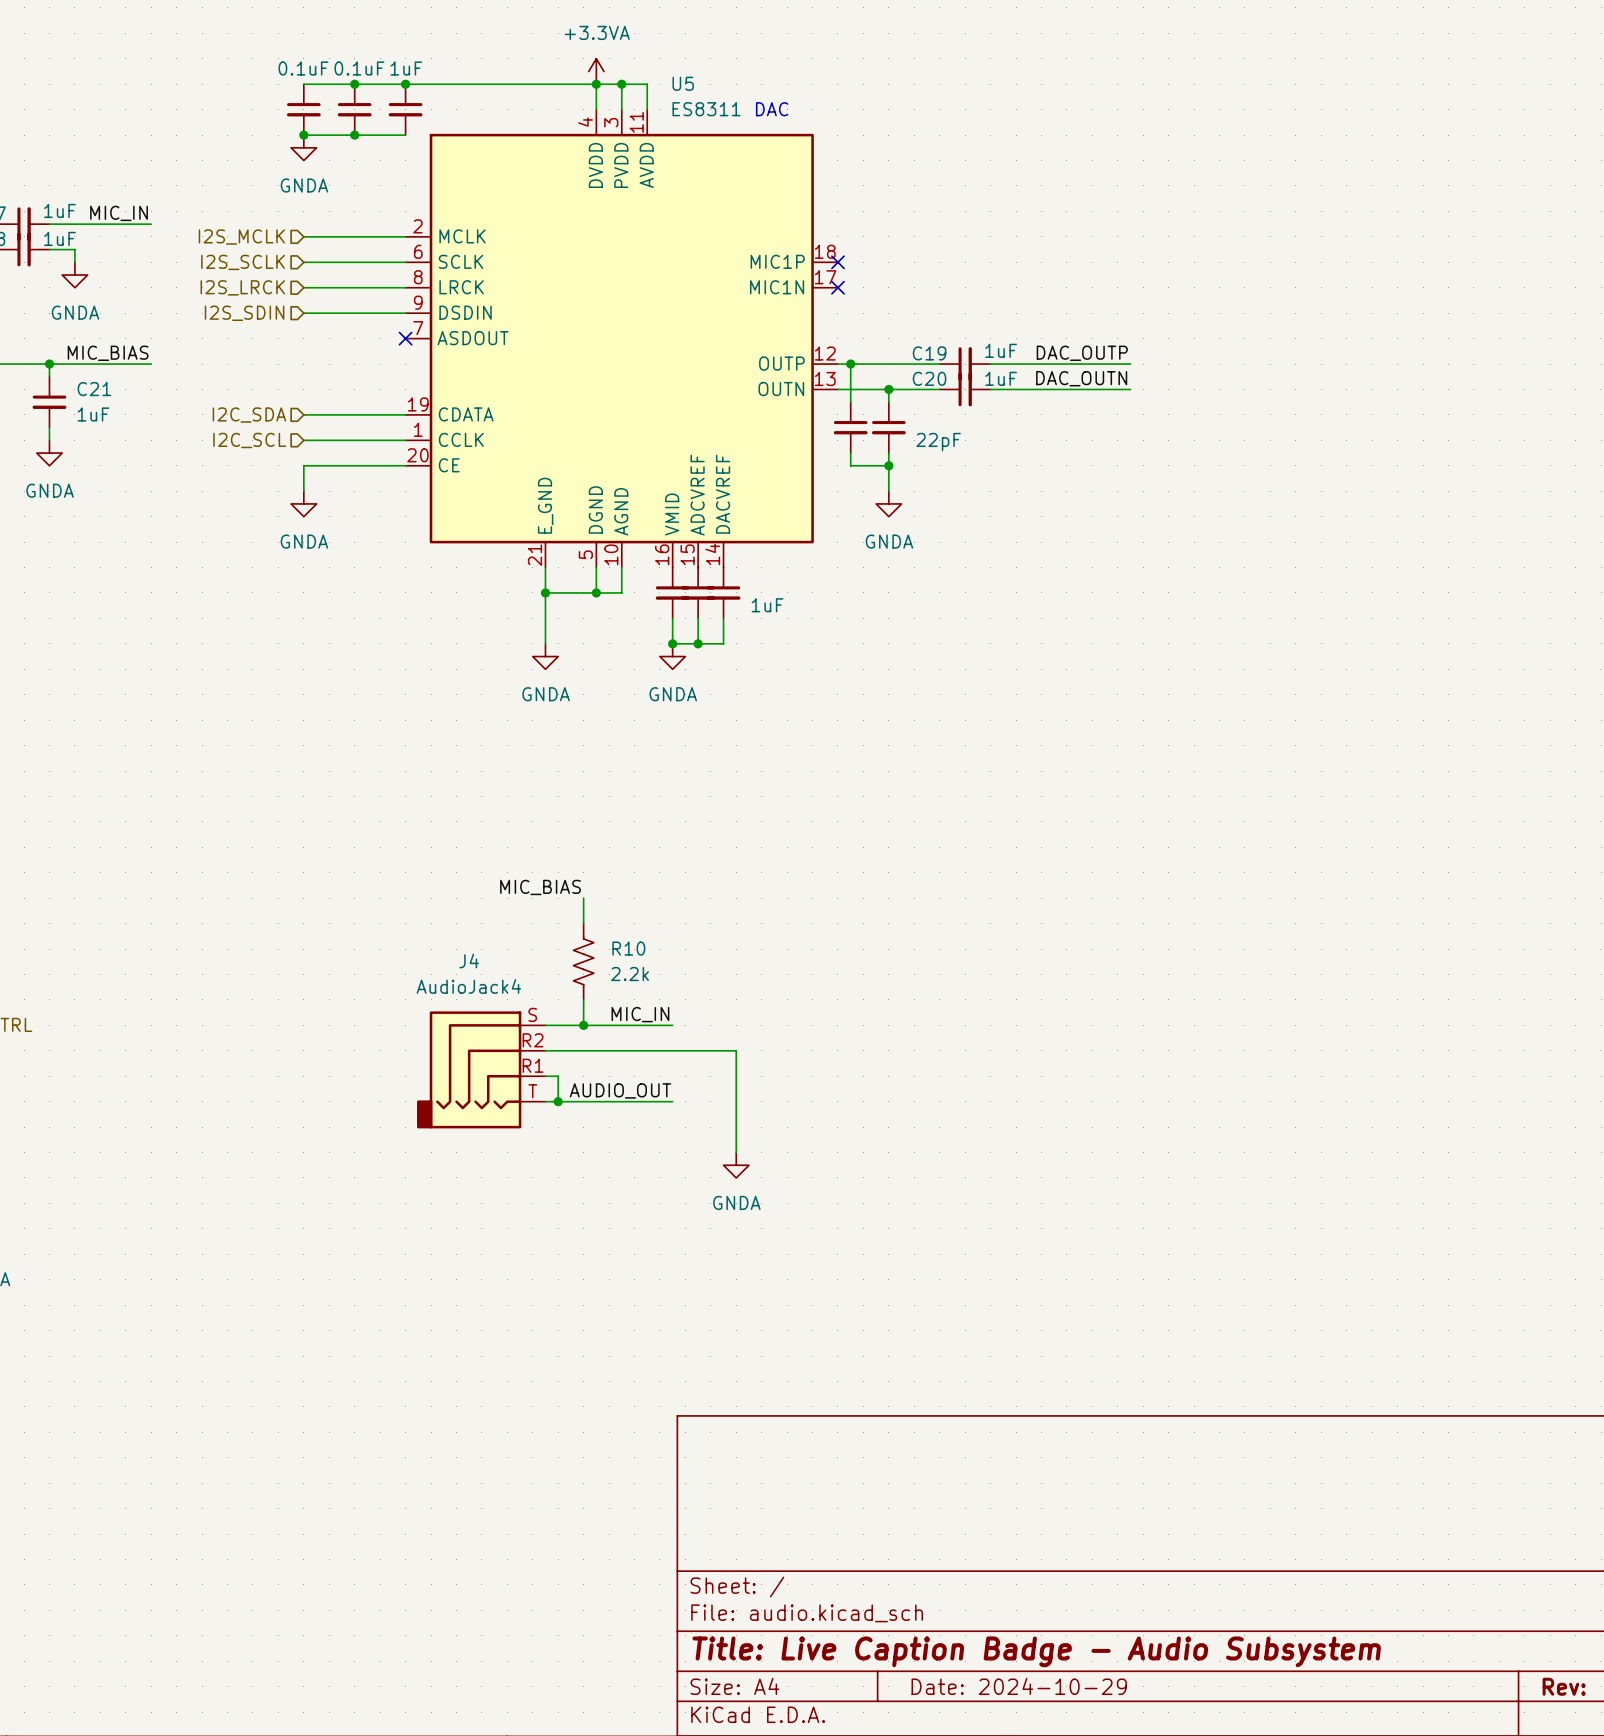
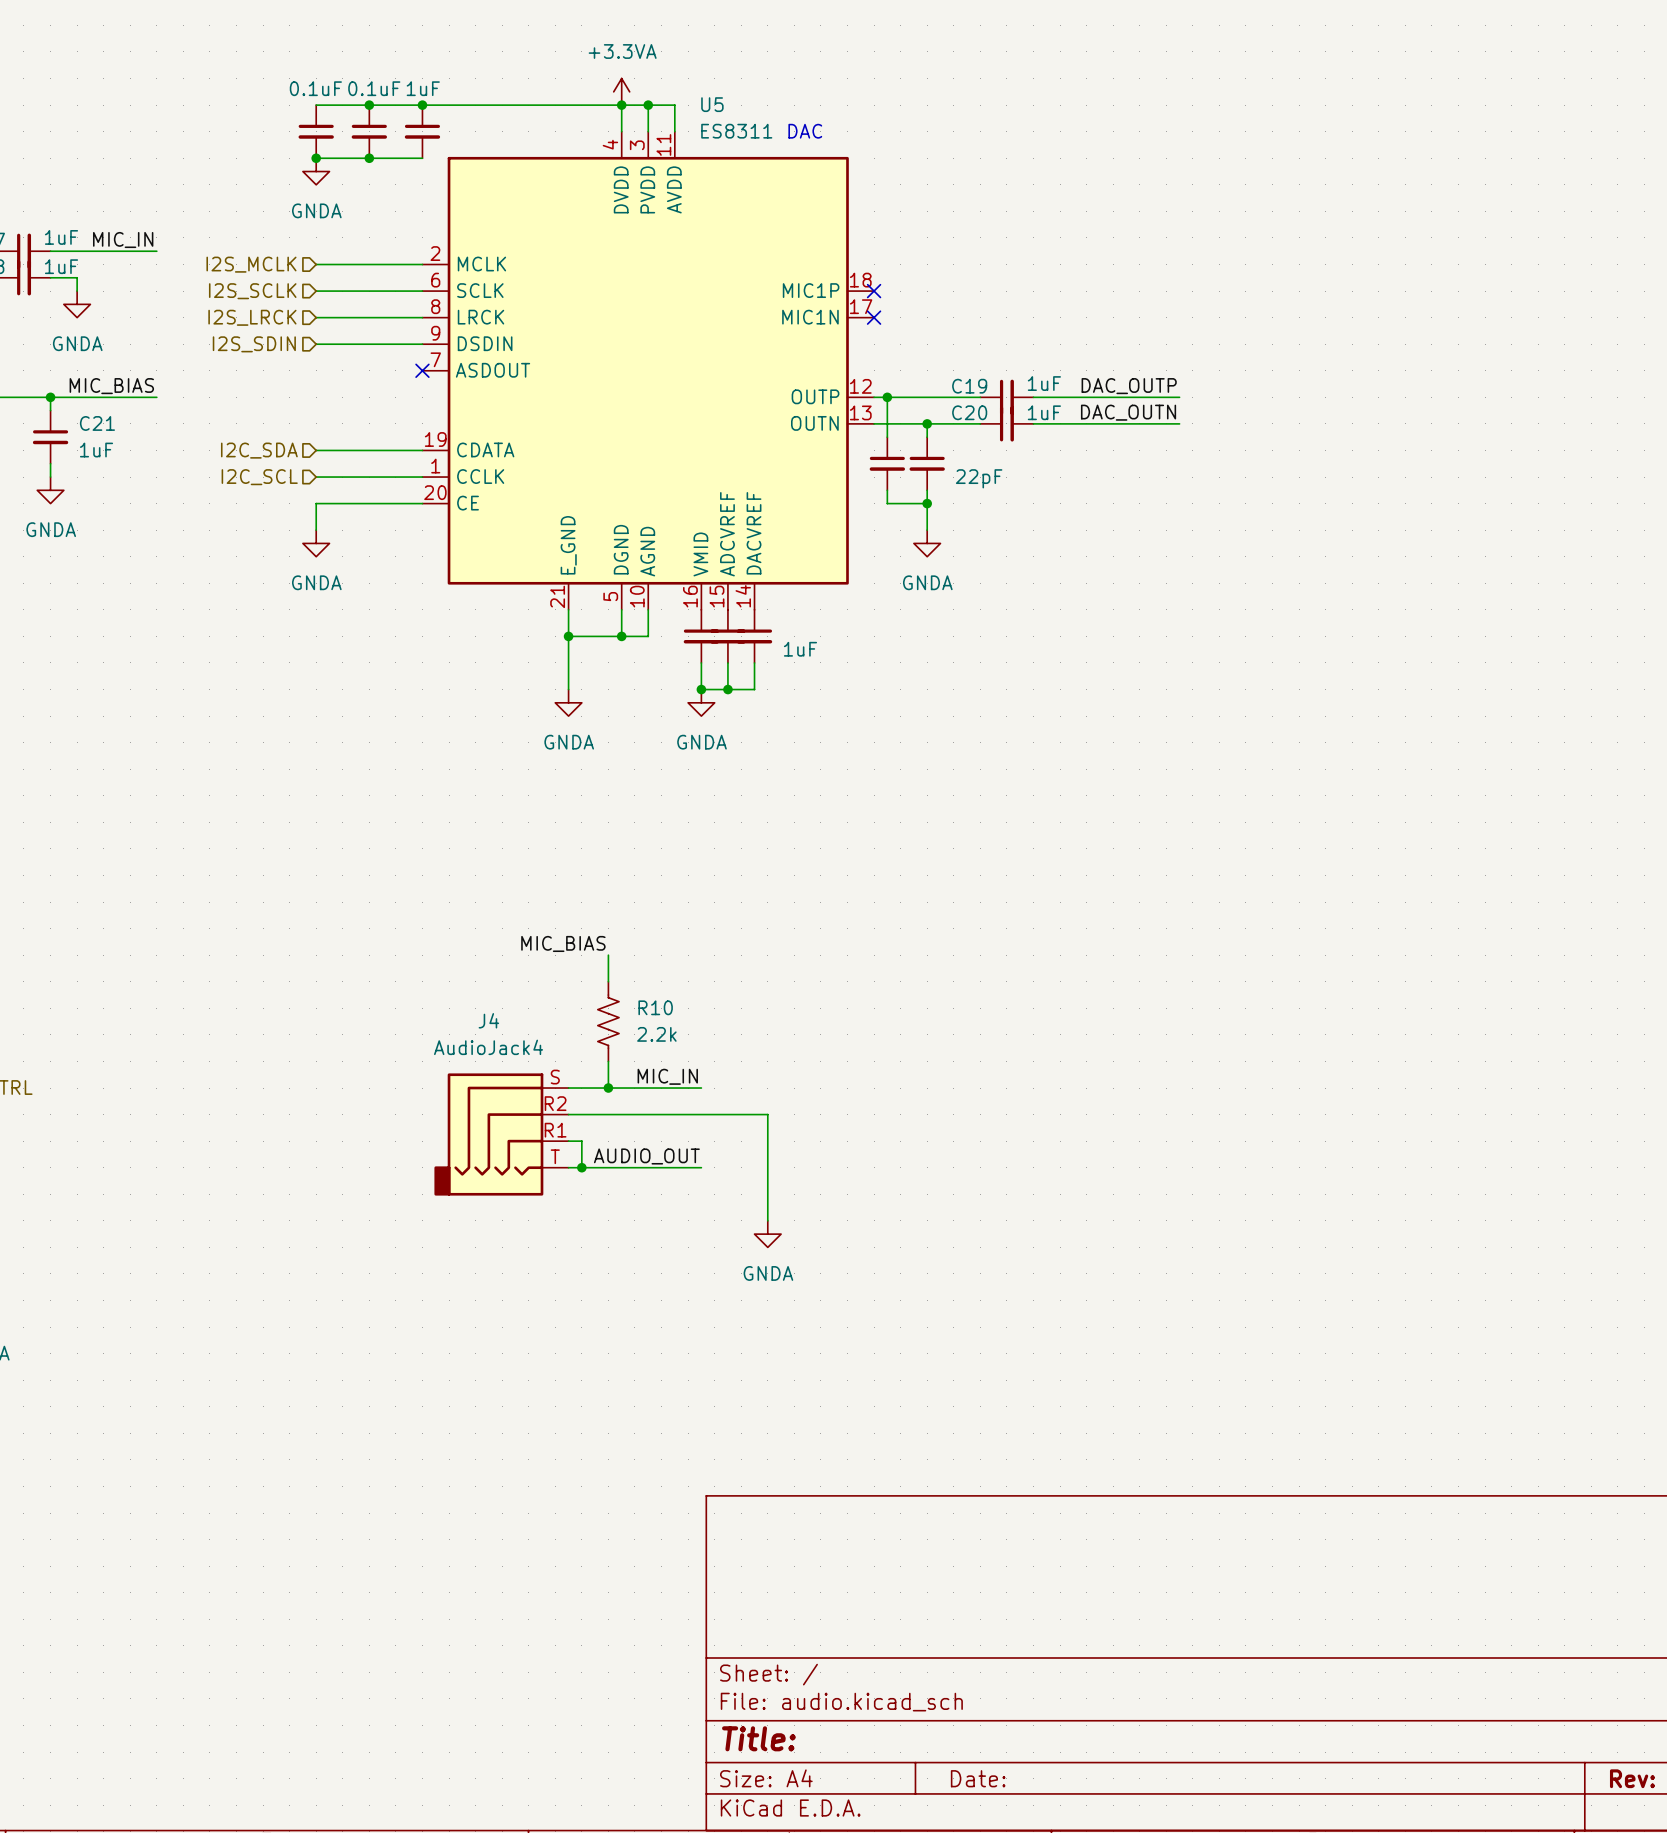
title block: Title: Live Caption Badge - Audio Subsystem (1036, 1651) -> Title: (758, 1738)
title block: Date: 2024-10-29 (1019, 1686) -> Date: (978, 1778)

